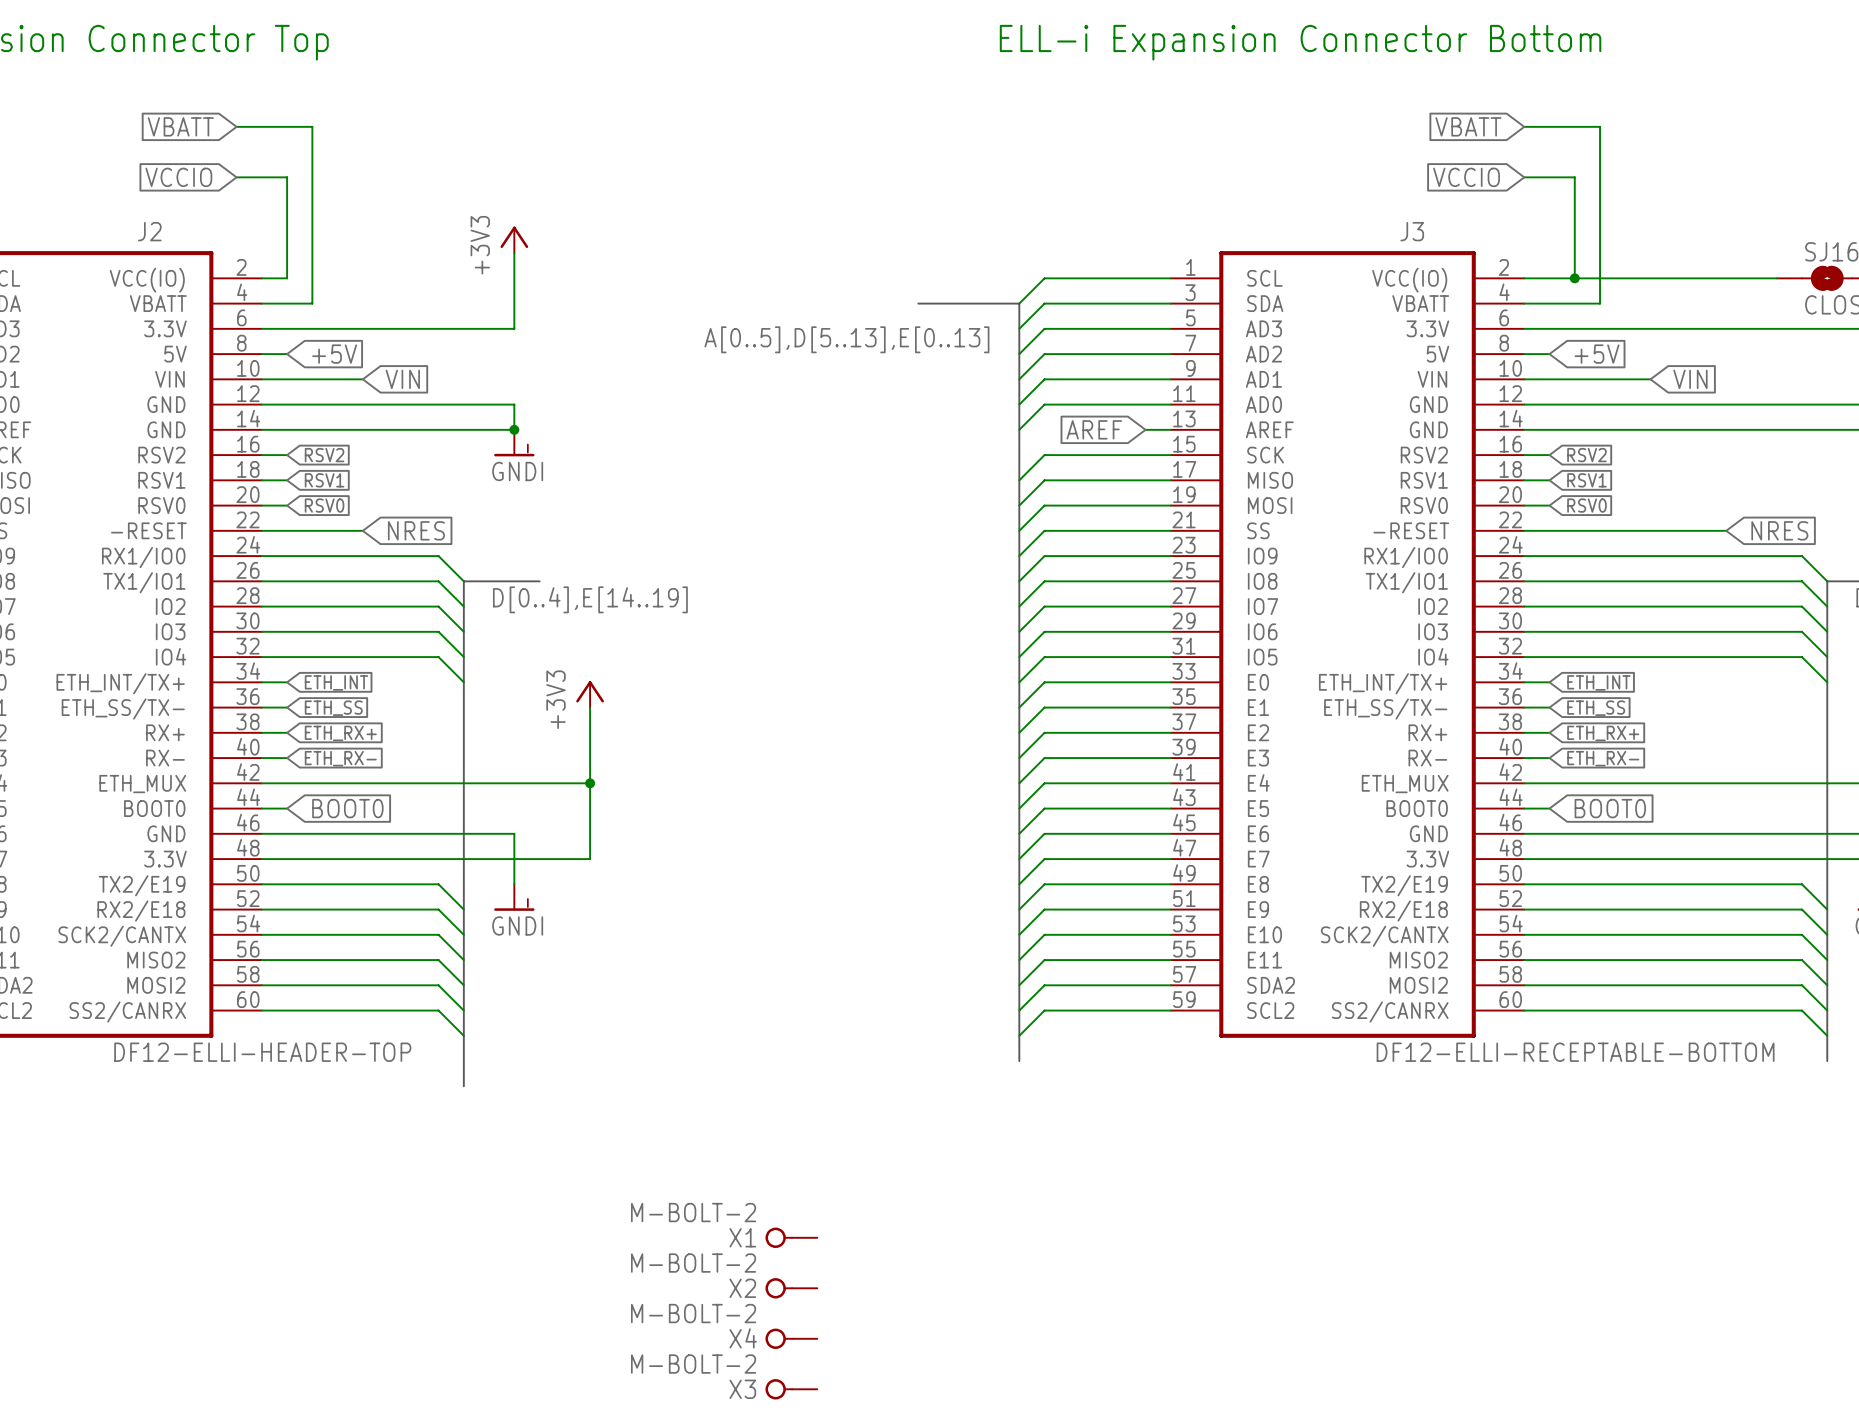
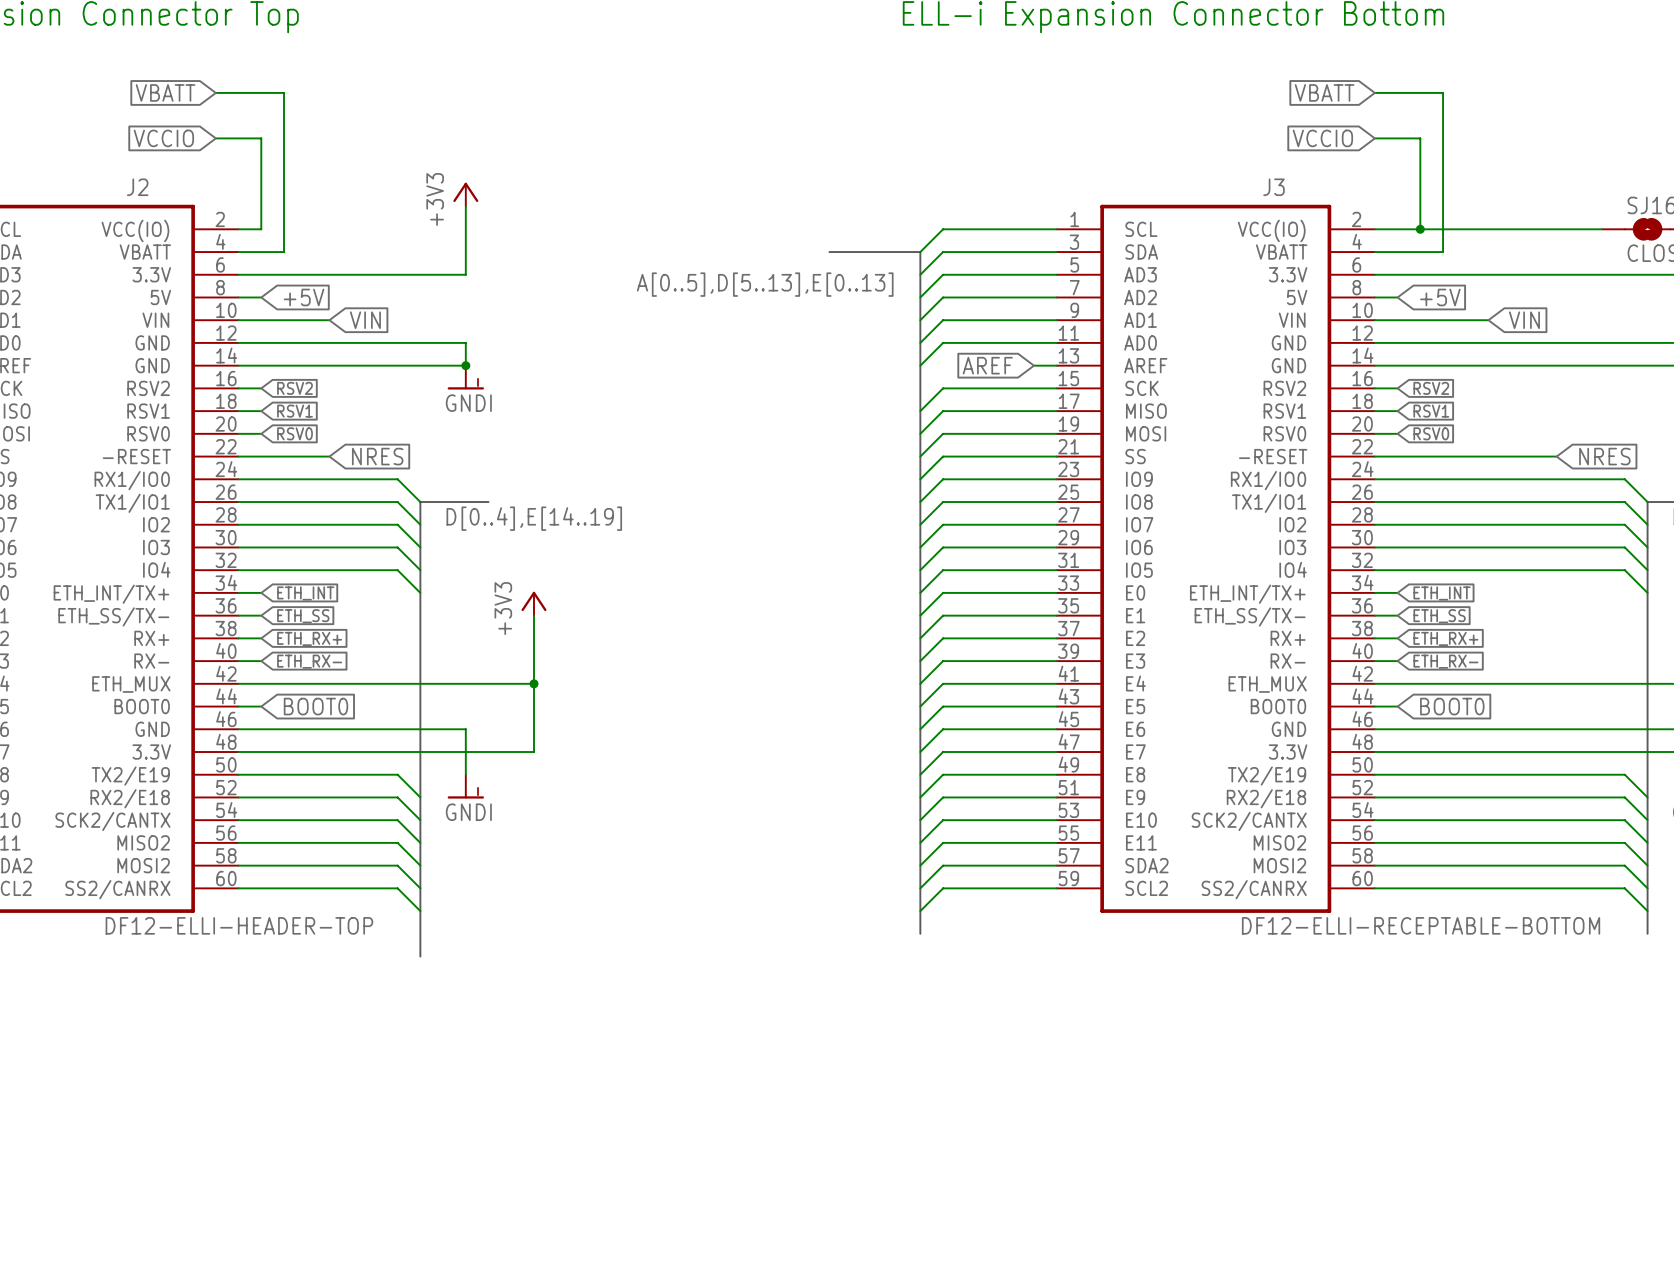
X1: M-BOLT-2 (791, 1237) -> none
X2: M-BOLT-2 (791, 1288) -> none
X4: M-BOLT-2 (791, 1338) -> none
X3: M-BOLT-2 (791, 1389) -> none

